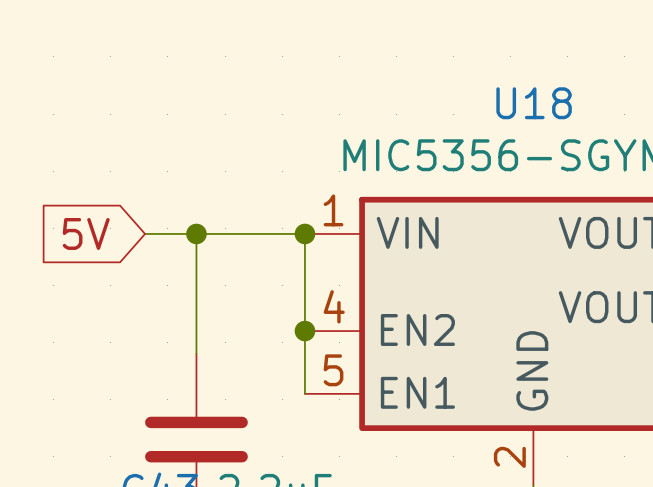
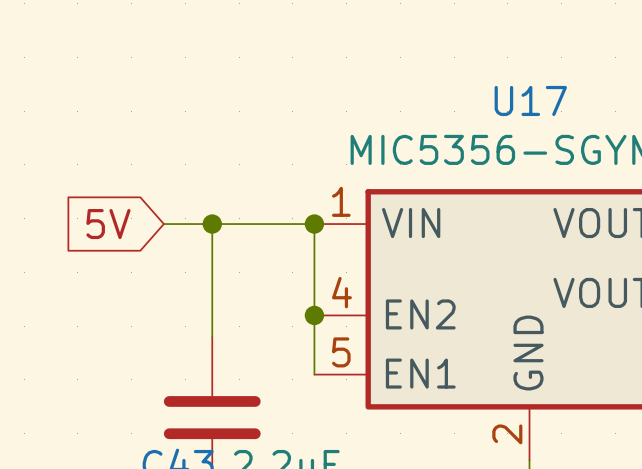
U18 name: U18 (534, 103) -> U17 (530, 100)

